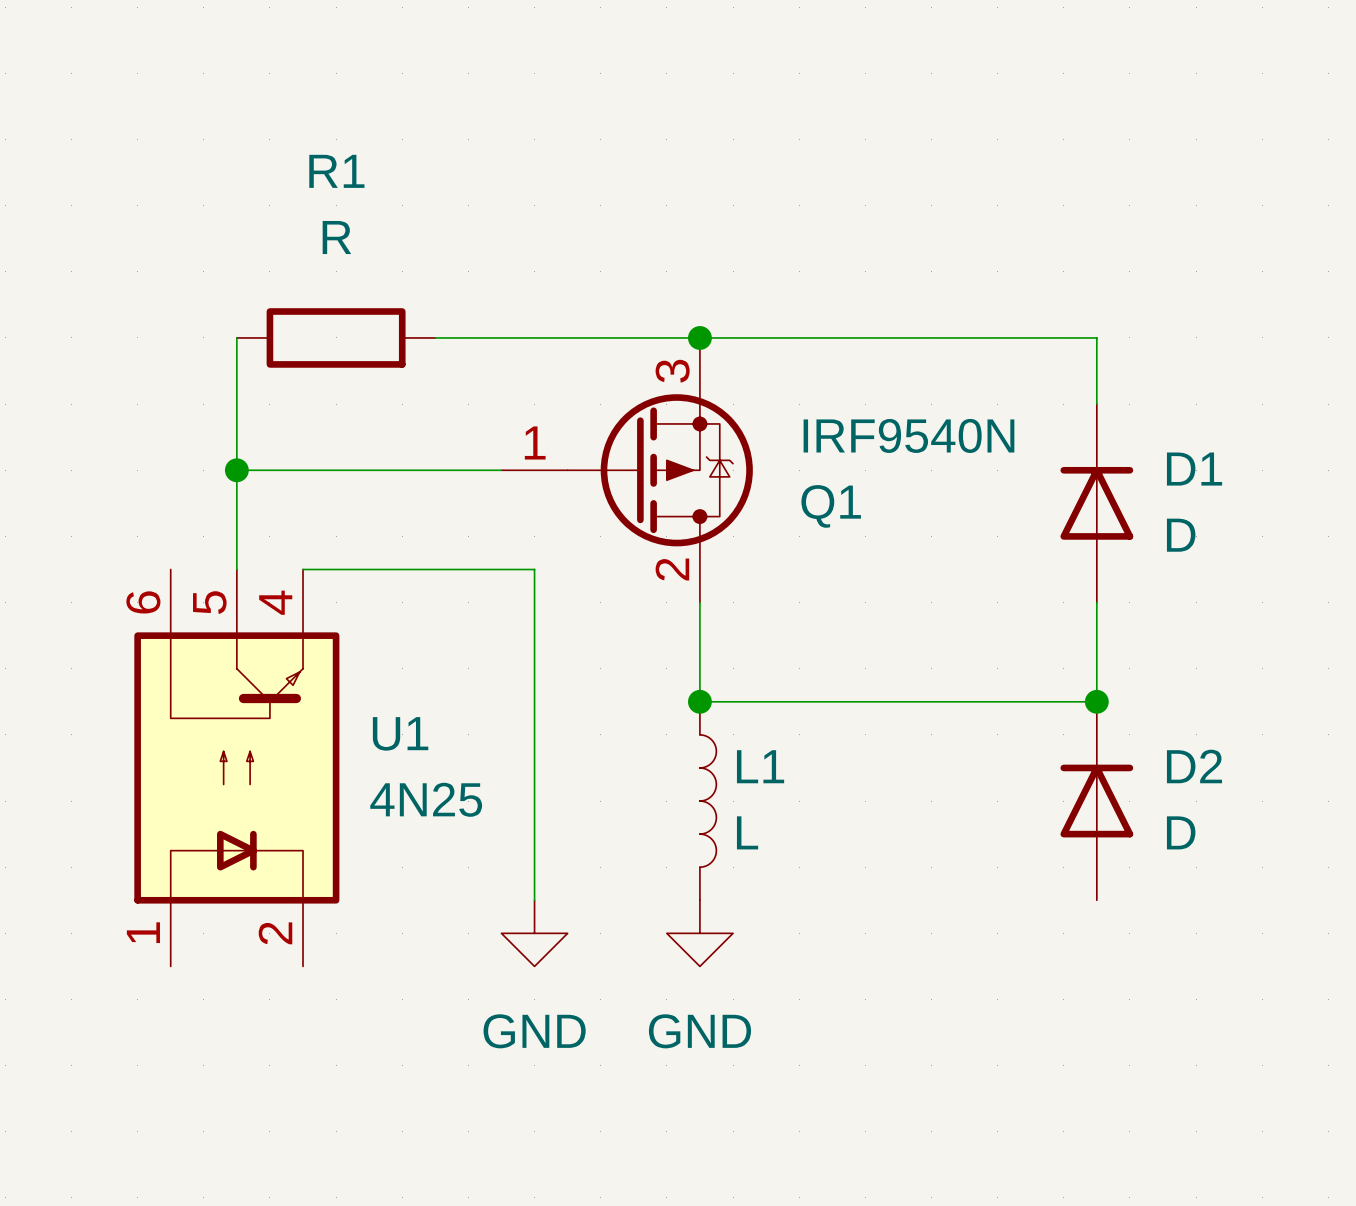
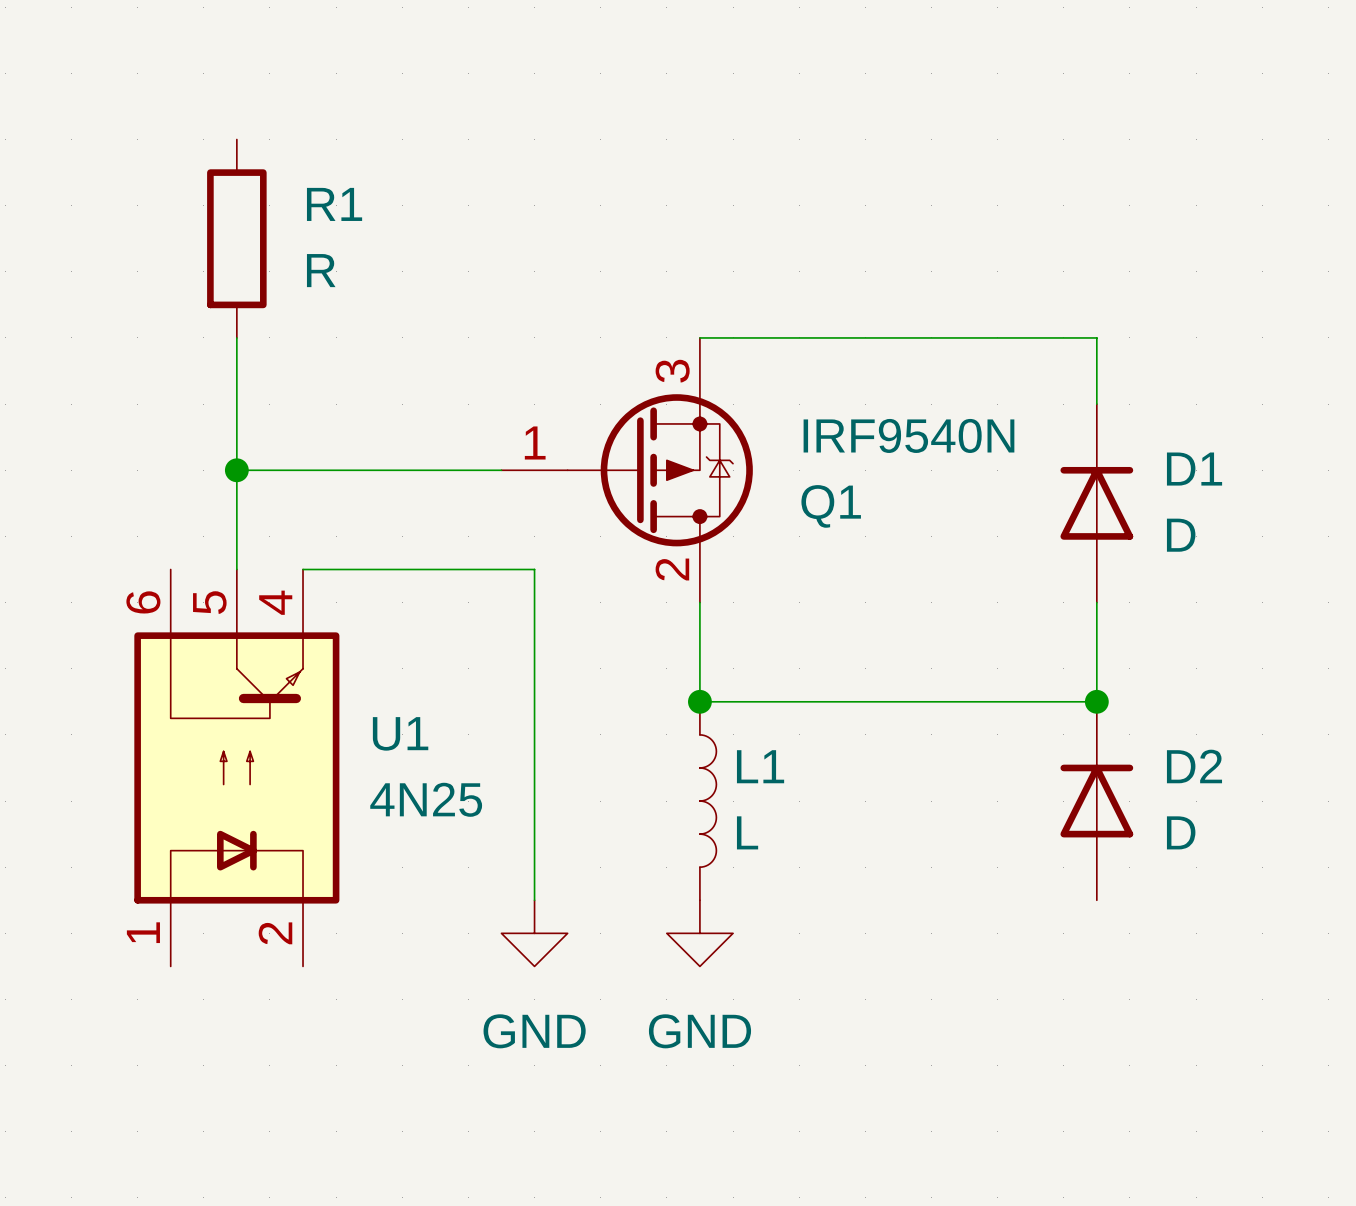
R1 name position: R1 (336, 171) -> R1 (334, 204)
R1 rotation: 0° (336, 337) -> 90° clockwise (236, 238)
R1 position: (336, 337) -> (236, 238)
wire: (435, 337) (699, 337) -> none
junction: (699, 337) -> none

